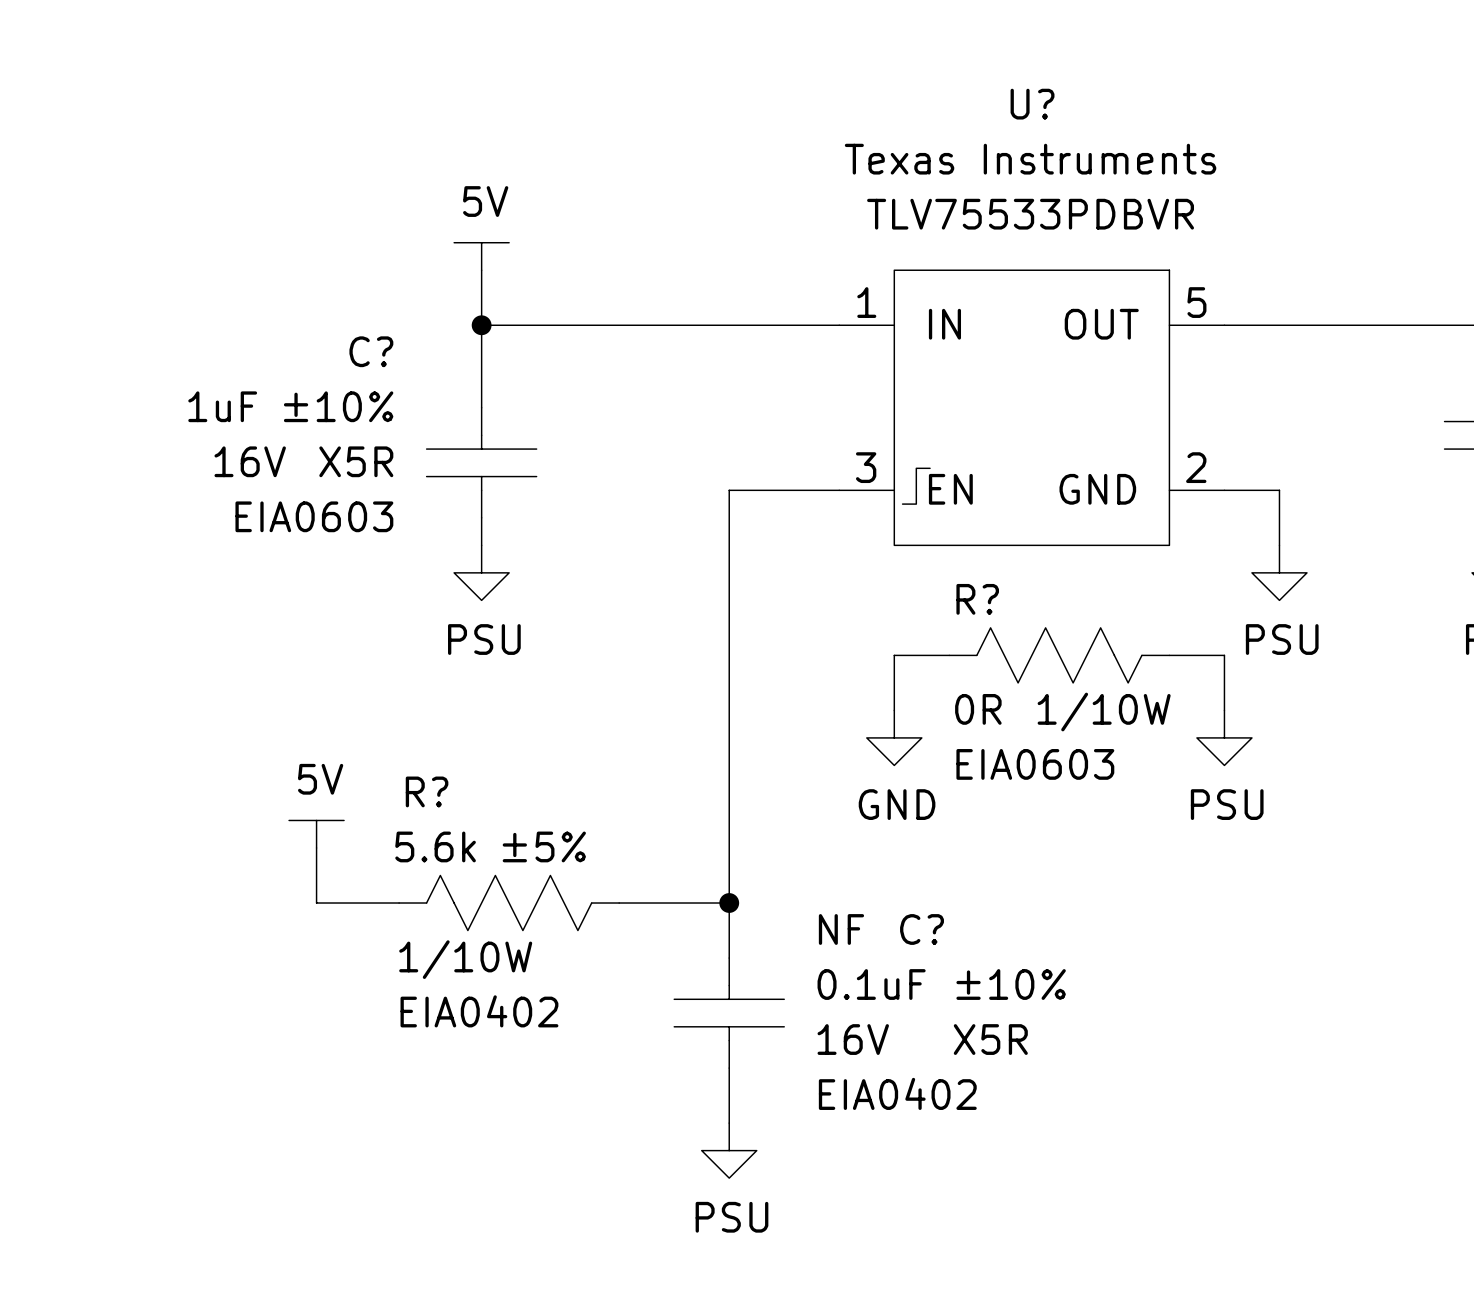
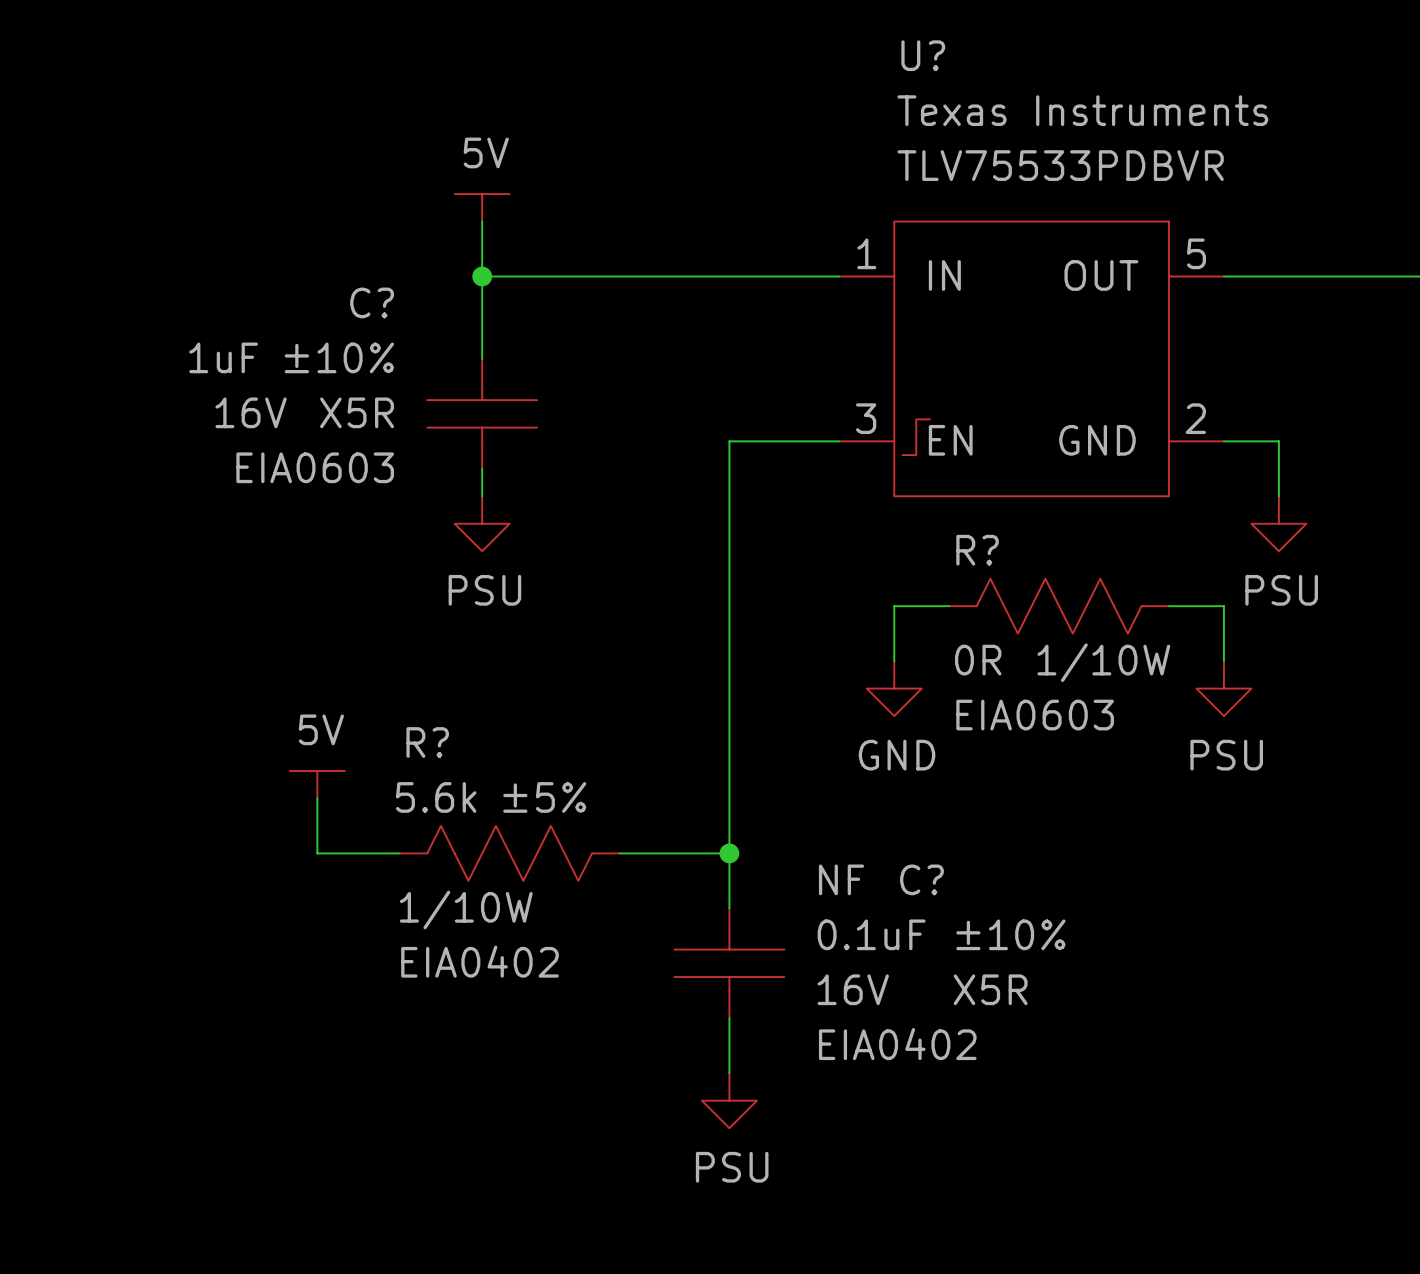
U? name position: U? (1032, 104) -> U? (923, 55)
U? text position: Texas Instruments (1030, 159) -> Texas Instruments (1082, 110)
U? text position: TLV75533PDBVR (1030, 214) -> TLV75533PDBVR (1060, 165)

